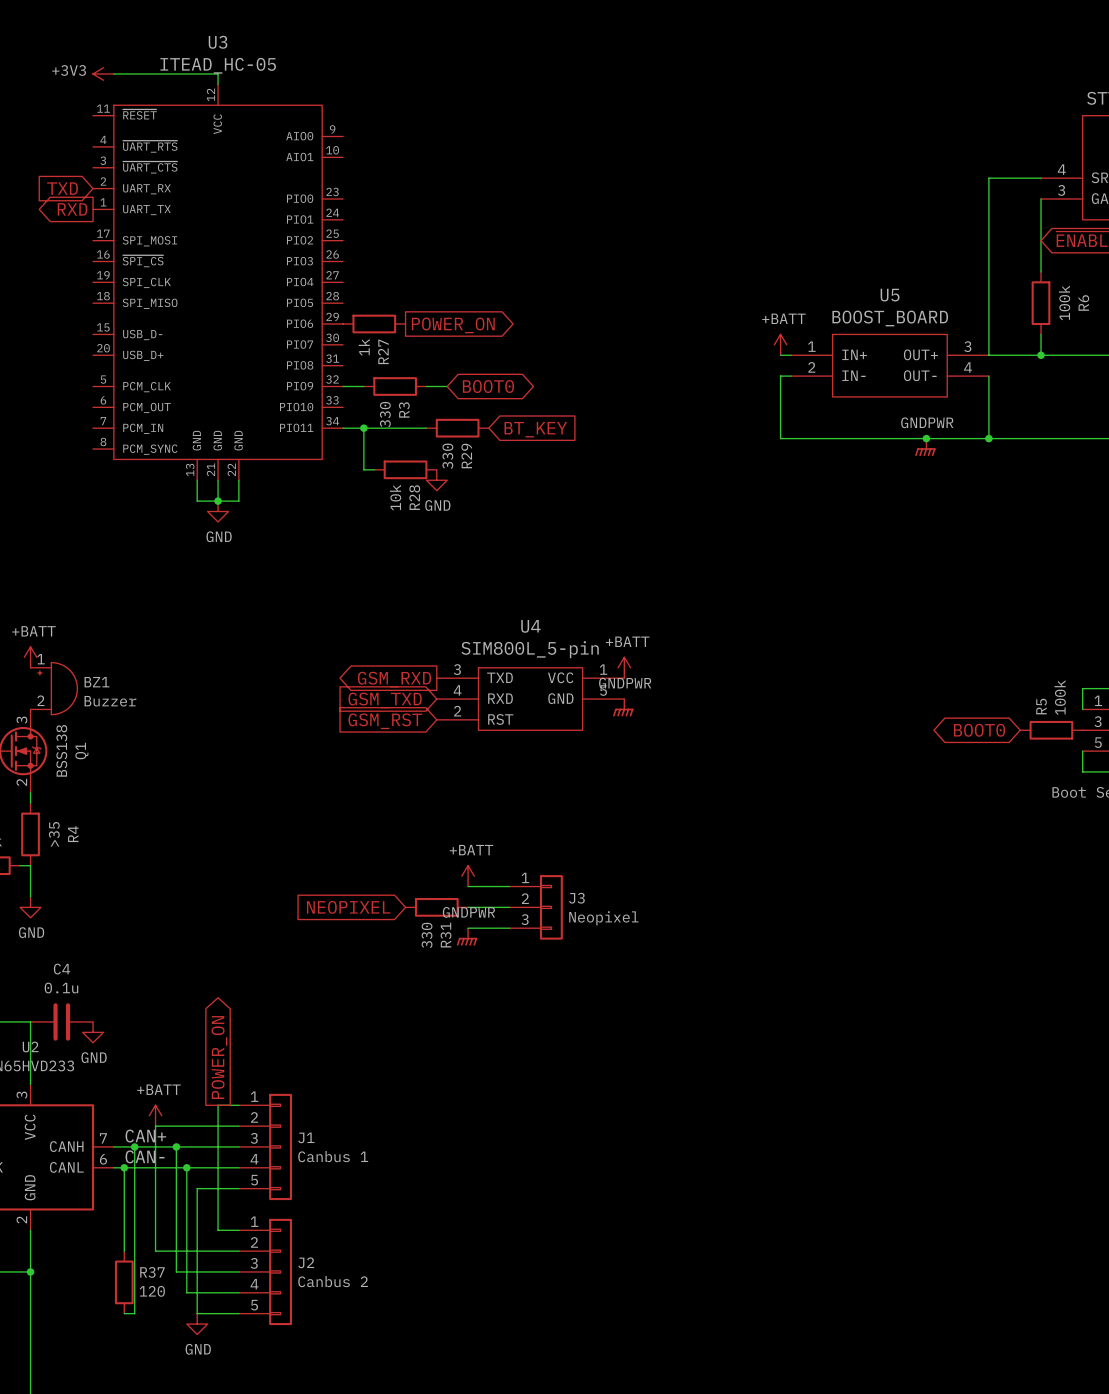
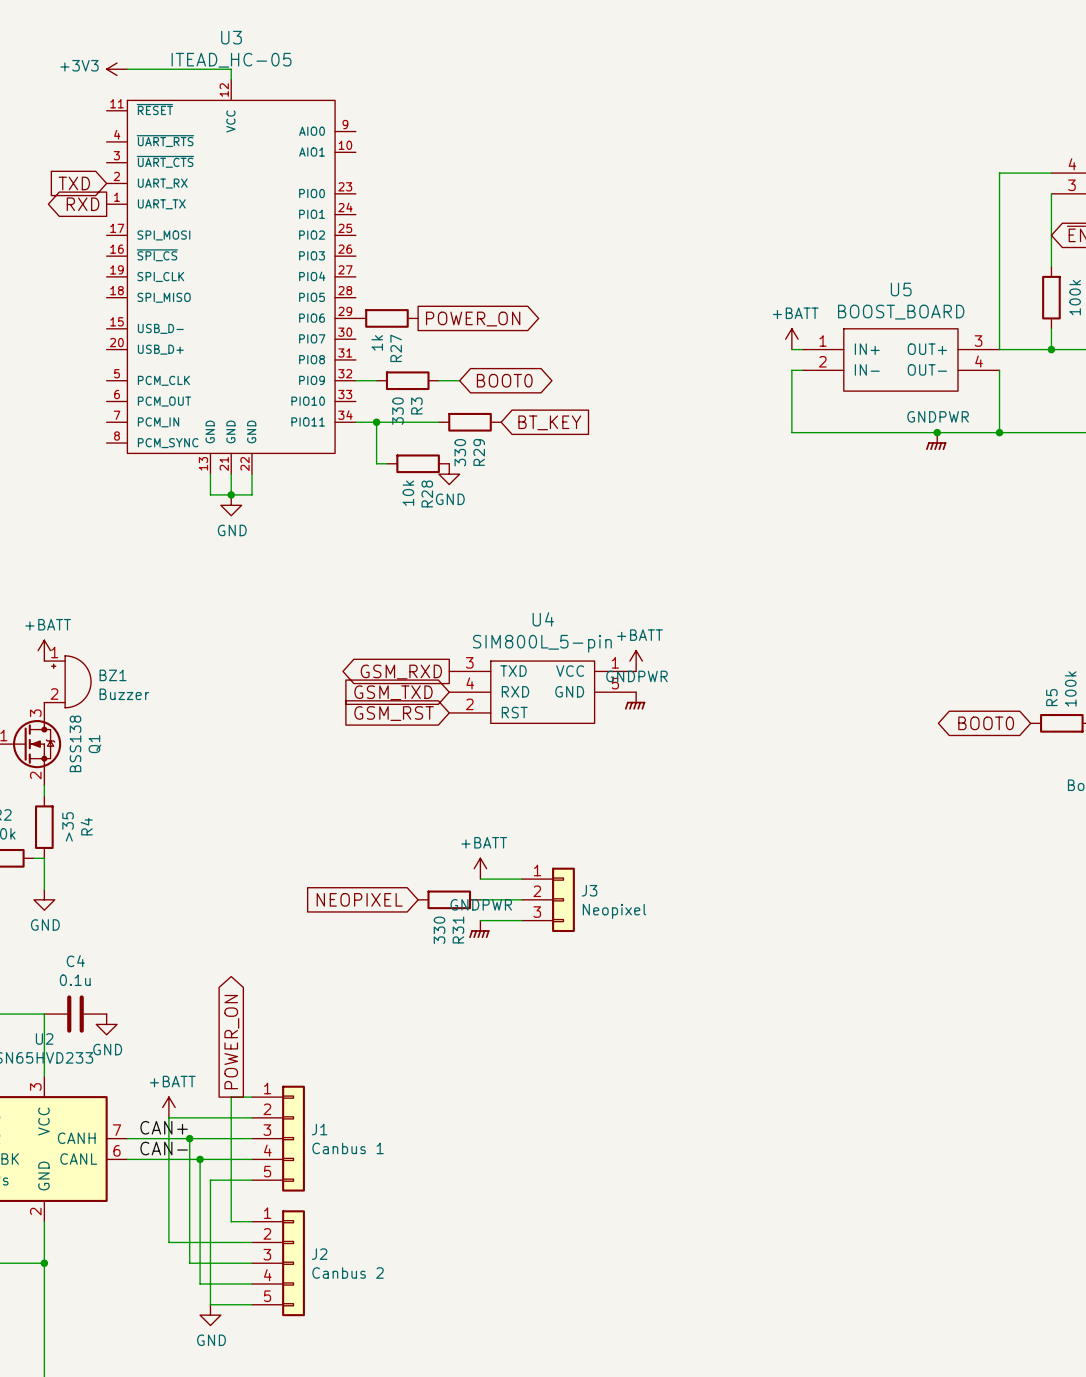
wire: (134, 1146) (134, 1313) (124, 1313) -> none
junction: (134, 1146) -> none
wire: (124, 1167) (124, 1251) -> none
junction: (124, 1167) -> none
R37: 120 (124, 1282) -> none

